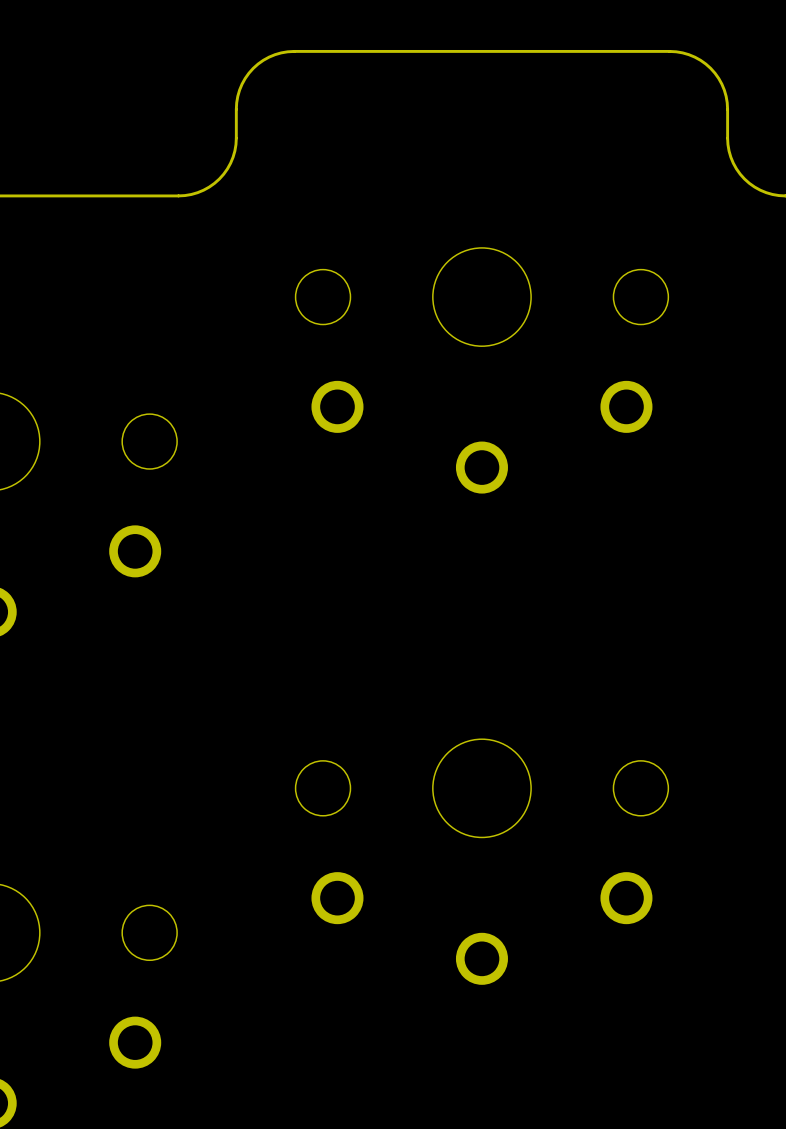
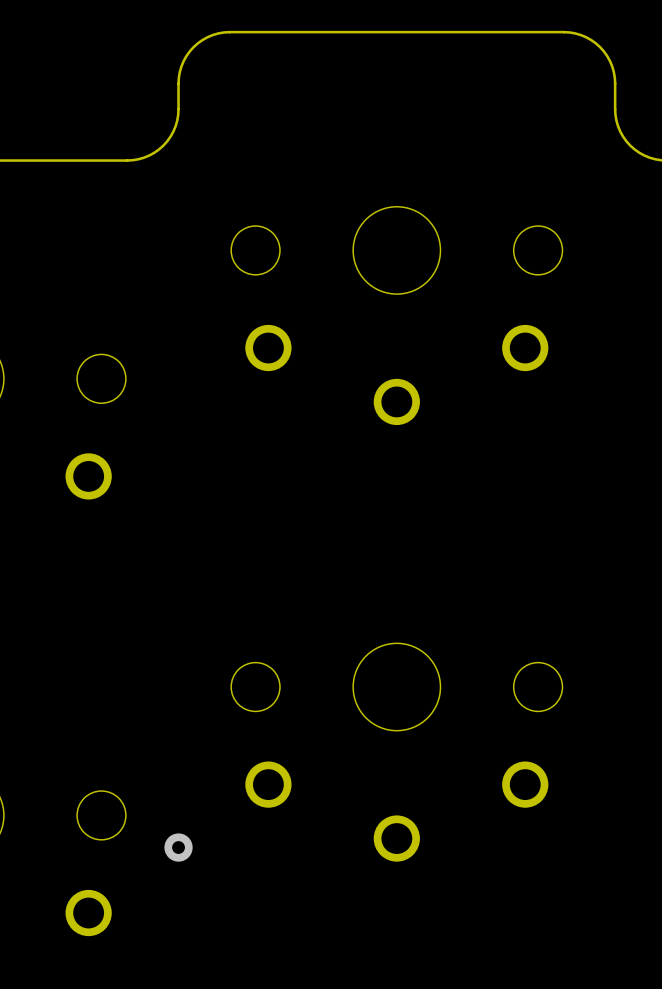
via: none -> (178, 847)

